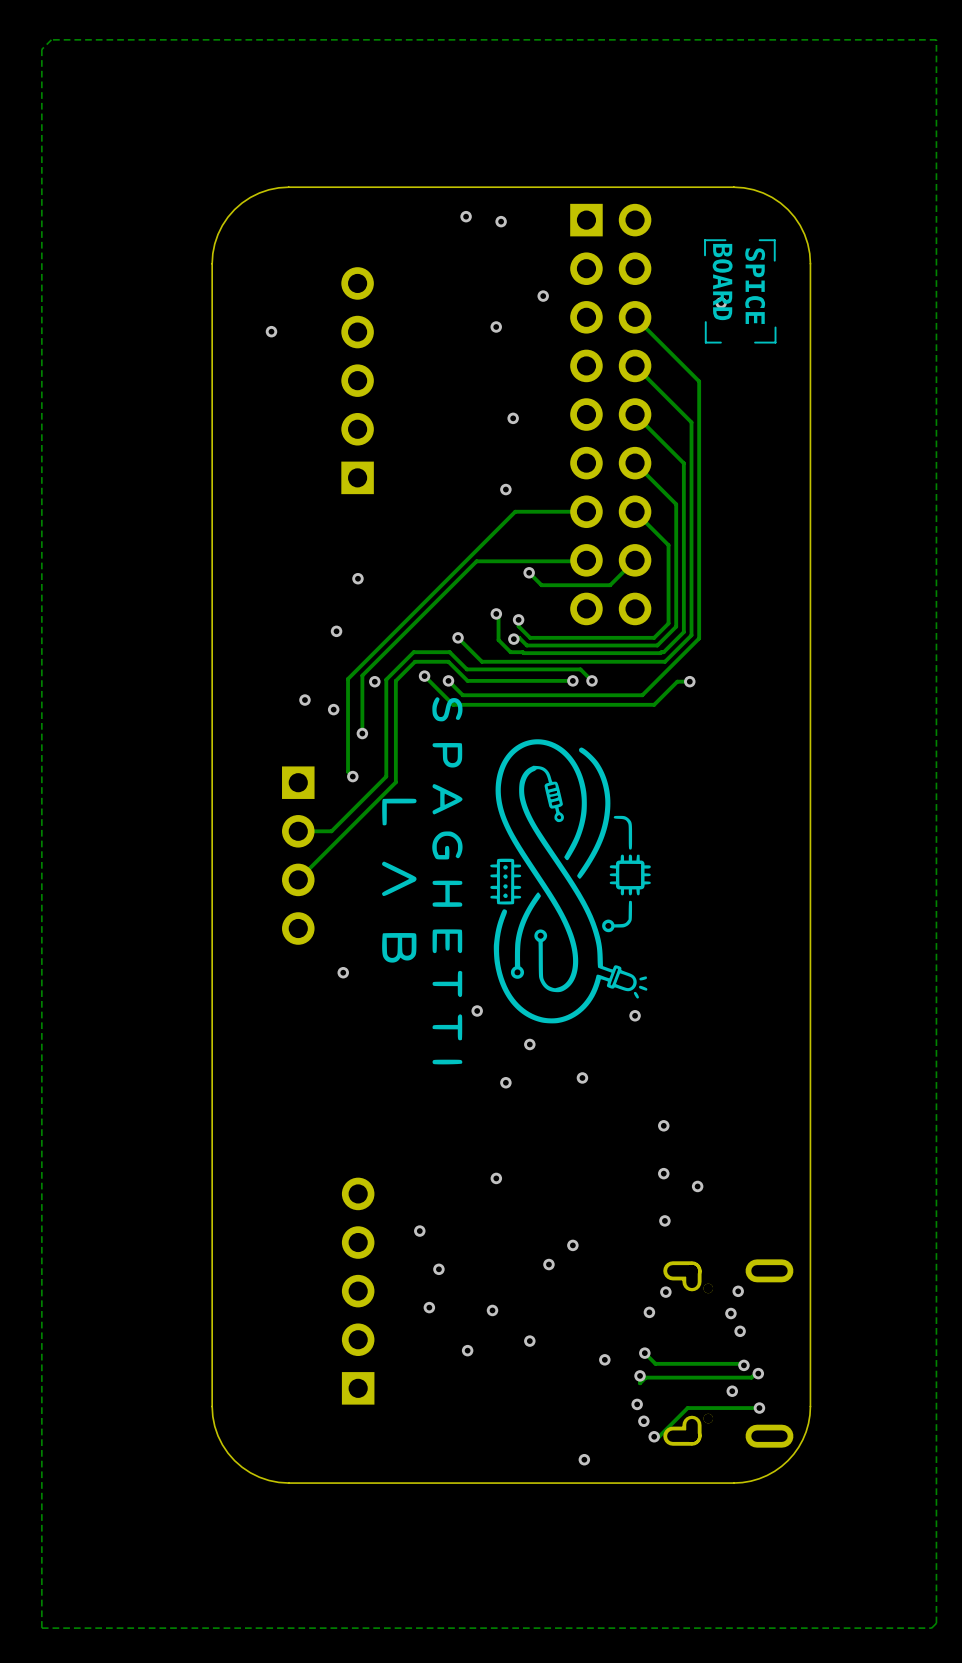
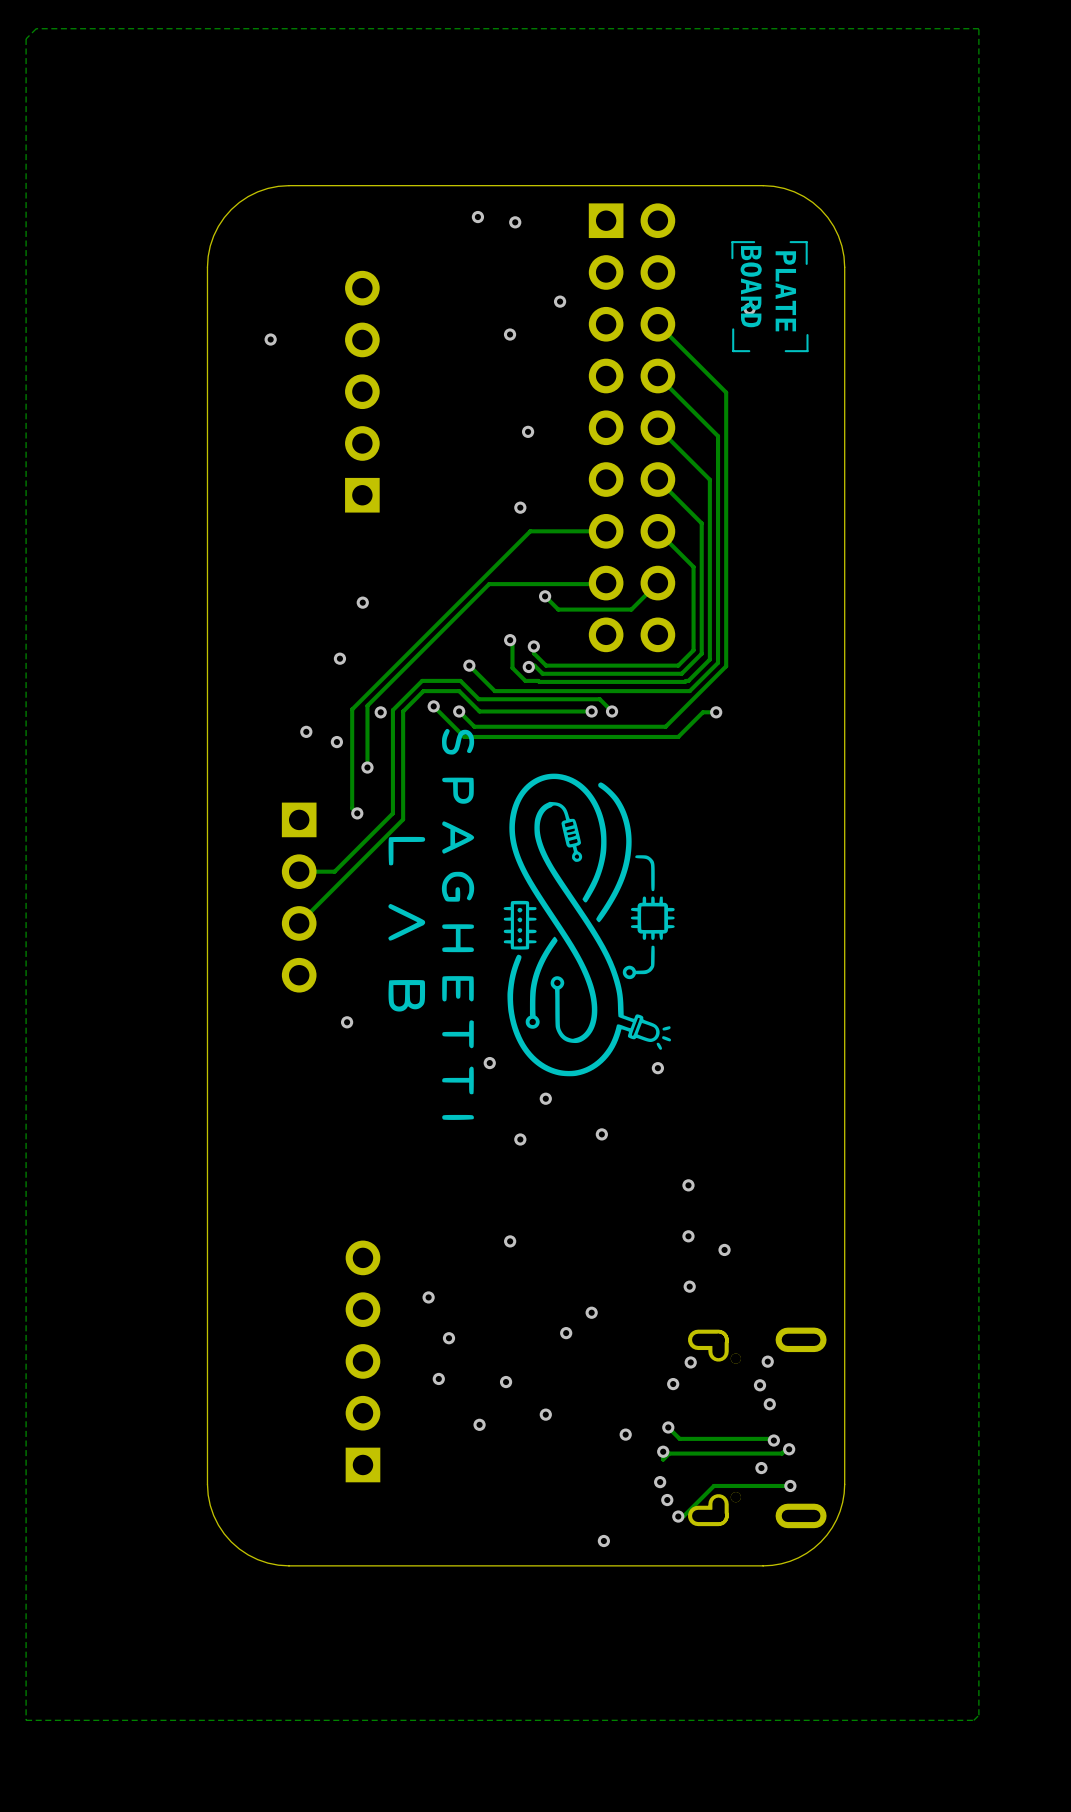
text: SPICE (755, 286) -> PLATE (785, 291)

